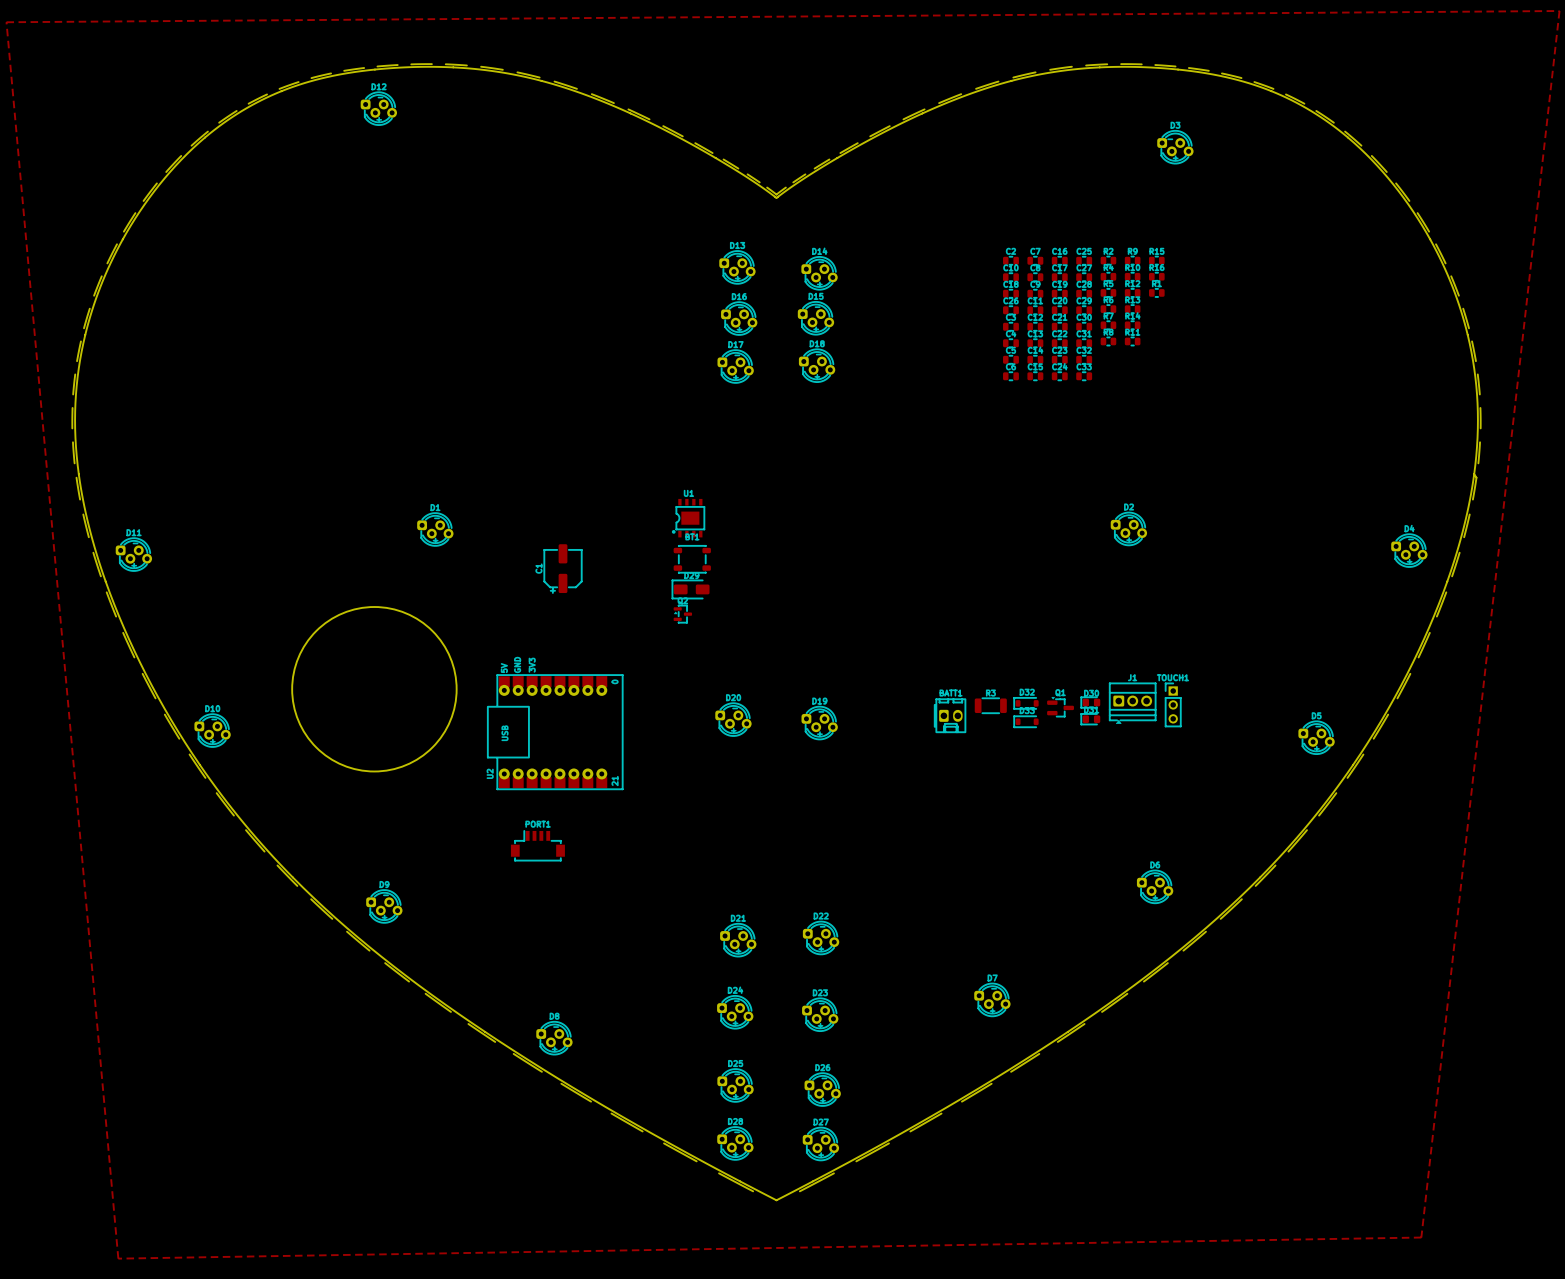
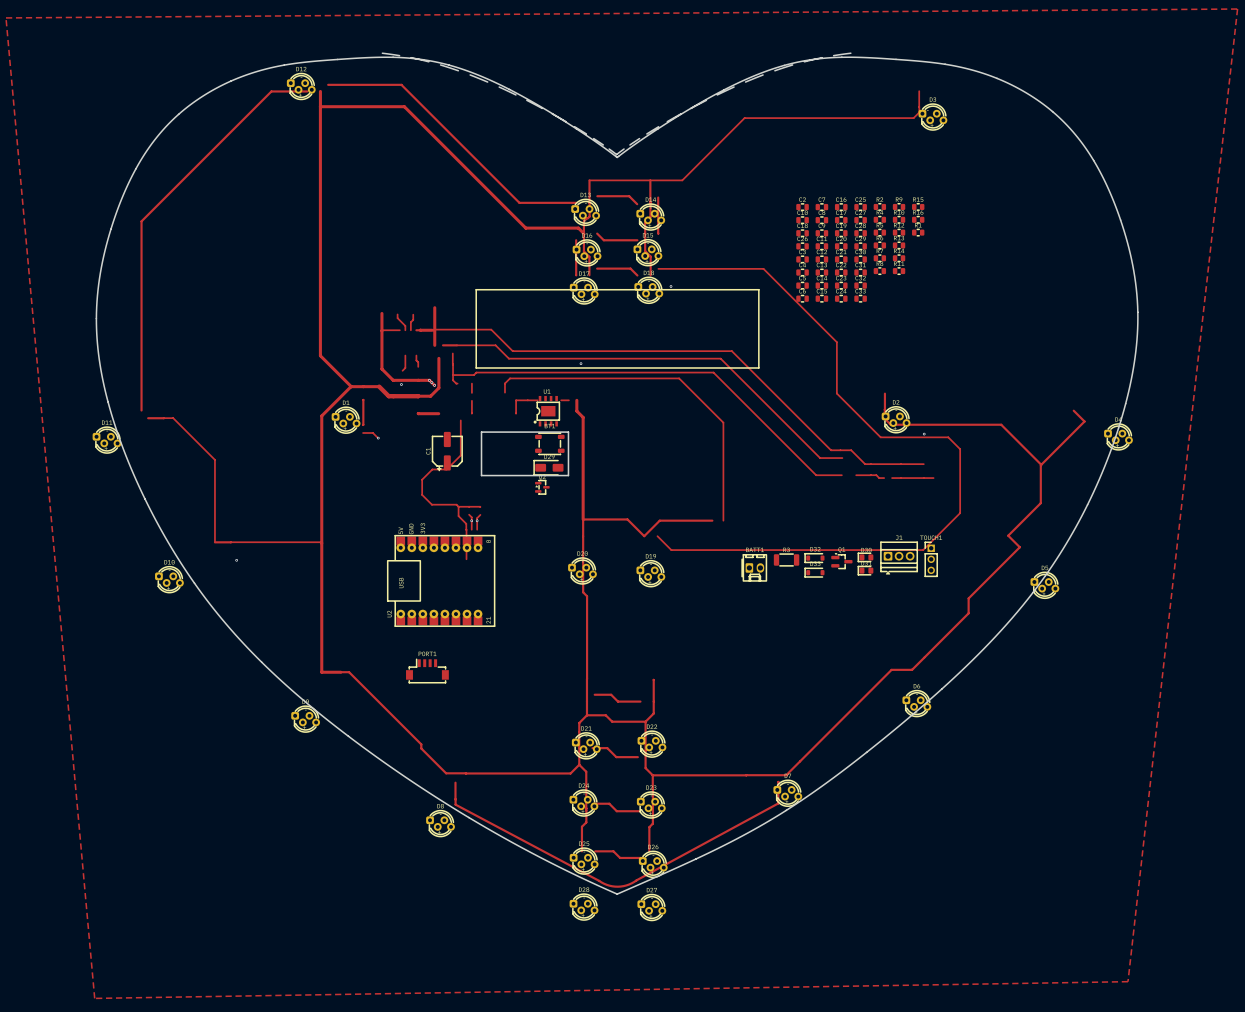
board edge: (431, 64) (411, 64) -> none
board edge: (445, 64) (466, 65) -> none
board edge: (1107, 64) (1086, 65) -> none
board edge: (1121, 64) (1141, 64) -> none
board edge: (397, 65) (377, 66) -> none
board edge: (1155, 65) (1175, 66) -> none
board edge: (364, 67) (344, 70) -> none
board edge: (1188, 67) (1208, 70) -> none
board edge: (331, 73) (311, 78) -> none
board edge: (1221, 73) (1241, 78) -> none
board edge: (298, 82) (279, 88) -> none
board edge: (1254, 82) (1273, 88) -> none
board edge: (267, 94) (248, 103) -> none
board edge: (1285, 94) (1304, 103) -> none
track: none -> (328, 84) (401, 84) (519, 202) (576, 202)
board edge: (236, 110) (219, 122) -> none
board edge: (1316, 110) (1333, 122) -> none
track: none -> (307, 91) (271, 91) (141, 221) (141, 410)
track: none -> (320, 91) (320, 106)
track: none -> (919, 91) (919, 112) (913, 118) (744, 118) (682, 180) (589, 180) (589, 216) (583, 221) (583, 251) (589, 256) (589, 275)
board edge: (207, 131) (191, 145) -> none
board edge: (1345, 131) (1361, 145) -> none
board edge: (181, 155) (166, 172) -> none
board edge: (1371, 155) (1386, 172) -> none
board edge: (156, 183) (143, 200) -> none
board edge: (1396, 183) (1409, 200) -> none
board edge: (135, 213) (123, 231) -> none
board edge: (1417, 213) (1429, 231) -> none
track: none -> (650, 180) (650, 217) (645, 222) (645, 251) (650, 256) (650, 275)
board edge: (117, 244) (107, 263) -> none
board edge: (1436, 244) (1445, 263) -> none
track: none -> (597, 196) (629, 196) (637, 204)
track: none -> (658, 197) (658, 233)
board edge: (101, 276) (94, 295) -> none
board edge: (1451, 276) (1458, 295) -> none
track: none -> (583, 233) (578, 228) (525, 228) (404, 106) (320, 106) (320, 355) (351, 386)
track: none -> (597, 233) (603, 240) (637, 240)
track: none -> (576, 240) (576, 275)
board edge: (89, 308) (84, 328) -> none
board edge: (1463, 308) (1468, 328) -> none
track: none -> (597, 268) (630, 268) (637, 275)
track: none -> (658, 268) (763, 268) (836, 342) (836, 393) (880, 437) (948, 437) (960, 449) (960, 513) (923, 550) (671, 550) (657, 536)
board edge: (80, 341) (77, 361) -> none
board edge: (1472, 341) (1475, 361) -> none
via: none -> (671, 286)
line: none -> (476, 289) (758, 289) (758, 367) (476, 367) (476, 289)
board edge: (75, 374) (73, 394) -> none
board edge: (1477, 374) (1479, 394) -> none
track: none -> (434, 307) (434, 345)
track: none -> (381, 313) (381, 369) (393, 380) (429, 380) (434, 385)
track: none -> (397, 314) (397, 318) (405, 325) (405, 330)
track: none -> (413, 314) (410, 330)
board edge: (72, 407) (72, 428) -> none
board edge: (1480, 407) (1480, 428) -> none
track: none -> (434, 329) (491, 329) (512, 351) (731, 351) (831, 450) (851, 450) (865, 464) (923, 464)
track: none -> (399, 330) (381, 330)
track: none -> (416, 330) (432, 330)
track: none -> (443, 345) (495, 345) (508, 358) (720, 358) (820, 458) (842, 458)
board edge: (72, 442) (74, 463) -> none
board edge: (1480, 442) (1478, 463) -> none
track: none -> (452, 353) (453, 380) (457, 383)
track: none -> (405, 355) (405, 368) (402, 370)
track: none -> (416, 355) (418, 366)
track: none -> (438, 358) (438, 387) (430, 396) (388, 396) (379, 386) (351, 386) (321, 415) (321, 672) (340, 672)
via: none -> (581, 363)
track: none -> (453, 375) (473, 375) (476, 372) (713, 372) (816, 475) (841, 475)
board edge: (1474, 474) (1464, 526) (1449, 574) (1429, 627) (1401, 685) (1374, 731) (1342, 780) (1309, 823) (1266, 870) (1228, 908) (1182, 947) (1134, 985) (1067, 1031) (931, 1115) (776, 1200) (604, 1106) (528, 1060) (458, 1013) (394, 966) (346, 927) (303, 887) (261, 843) (215, 787) (178, 731) (145, 673) (118, 615) (98, 560) (84, 506) (76, 455) (75, 402) (81, 351) (96, 298) (116, 251) (144, 204) (181, 159) (218, 126) (261, 100) (304, 83) (356, 71) (418, 66) (480, 69) (535, 79) (592, 97) (653, 124) (725, 163) (776, 197) (819, 168) (877, 135) (927, 111) (977, 91) (1017, 79) (1061, 70) (1104, 67) (1149, 67) (1190, 70) (1225, 77) (1254, 85) (1286, 97) (1315, 113) (1343, 133) (1371, 159) (1393, 184) (1417, 218) (1436, 251) (1452, 286) (1464, 322) (1472, 360) (1477, 394) (1477, 437) (1474, 474) -> (393, 57) (304, 62) (250, 73) (223, 84) (199, 98) (178, 114) (157, 136) (140, 161) (123, 194) (110, 229) (101, 267) (97, 301) (96, 333) (100, 364) (108, 401) (133, 474) (171, 547) (213, 609) (266, 667) (336, 727) (428, 792) (521, 847) (617, 894) (736, 838) (780, 813) (821, 786) (880, 741) (941, 689) (989, 642) (1028, 598) (1059, 554) (1084, 510) (1107, 460) (1124, 409) (1134, 362) (1137, 323) (1135, 282) (1127, 242) (1116, 208) (1103, 178) (1087, 150) (1070, 128) (1049, 109) (1022, 90) (997, 78) (967, 68) (926, 61) (858, 57) (820, 58) (787, 64) (750, 77) (710, 96) (661, 126) (617, 157) (552, 113) (490, 80) (442, 63) (393, 57)
board edge: (1474, 474) (1476, 477) (1472, 499) -> none
board edge: (76, 477) (80, 499) -> none
via: none -> (429, 380)
via: none -> (431, 382)
track: none -> (471, 383) (471, 392)
via: none -> (401, 384)
via: none -> (434, 385)
track: none -> (504, 392) (504, 383) (510, 378) (679, 378) (723, 422) (723, 520)
track: none -> (884, 393) (884, 418) (890, 424) (1001, 424) (1041, 464)
track: none -> (363, 400) (363, 425)
track: none -> (537, 400) (516, 400) (516, 413)
track: none -> (561, 400) (568, 400)
track: none -> (576, 400) (576, 411) (583, 417) (583, 519)
track: none -> (471, 400) (471, 413)
board edge: (83, 514) (88, 537) -> none
board edge: (1469, 514) (1464, 537) -> none
track: none -> (1073, 410) (1084, 421) (1040, 465) (1040, 503) (1008, 535) (1019, 547) (968, 598) (968, 613) (912, 669) (891, 669) (786, 775) (652, 775)
track: none -> (418, 413) (438, 413)
track: none -> (148, 418) (173, 418) (214, 459) (214, 542) (321, 543)
track: none -> (460, 420) (460, 455) (446, 469) (432, 469) (422, 479) (422, 494) (431, 504) (456, 504) (458, 506)
board edge: none -> (481, 432) (568, 432) (568, 475) (481, 475) (481, 432)
track: none -> (363, 433) (372, 433) (378, 438)
via: none -> (924, 434)
board edge: (93, 552) (100, 576) -> none
via: none -> (378, 438)
board edge: (1459, 552) (1452, 576) -> none
board edge: (106, 592) (116, 616) -> none
board edge: (1446, 592) (1436, 616) -> none
track: none -> (856, 475) (870, 475)
track: none -> (870, 475) (884, 478)
track: none -> (892, 478) (933, 478)
round board edge: [292, 606, 457, 772] -> none
board edge: (123, 632) (134, 657) -> none
board edge: (1429, 632) (1418, 657) -> none
track: none -> (458, 506) (480, 506)
track: none -> (458, 506) (458, 516) (466, 523) (466, 559)
track: none -> (469, 514) (471, 517) (471, 529)
track: none -> (480, 514) (477, 518) (477, 529)
track: none -> (583, 519) (583, 592) (587, 596) (586, 715)
track: none -> (583, 519) (627, 519) (644, 536) (659, 520) (712, 520)
via: none -> (471, 520)
via: none -> (477, 520)
board edge: (142, 673) (155, 698) -> none
board edge: (1410, 673) (1397, 698) -> none
via: none -> (236, 560)
board edge: (164, 714) (179, 738) -> none
board edge: (1388, 714) (1373, 738) -> none
board edge: (189, 754) (205, 777) -> none
board edge: (1363, 754) (1347, 777) -> none
board edge: (216, 793) (233, 815) -> none
board edge: (1336, 793) (1319, 815) -> none
board edge: (246, 830) (264, 851) -> none
board edge: (1307, 830) (1288, 851) -> none
track: none -> (340, 672) (349, 672) (421, 744) (421, 748) (446, 773) (570, 773) (579, 764)
track: none -> (653, 679) (653, 713) (645, 721)
board edge: (277, 865) (297, 885) -> none
board edge: (1275, 865) (1255, 885) -> none
track: none -> (594, 694) (611, 694) (617, 701) (640, 701)
board edge: (311, 899) (332, 918) -> none
board edge: (1241, 899) (1220, 918) -> none
track: none -> (586, 715) (605, 715) (612, 721) (645, 721)
track: none -> (586, 715) (579, 723) (579, 764)
track: none -> (645, 721) (645, 768) (652, 775)
board edge: (347, 931) (369, 950) -> none
board edge: (1205, 931) (1183, 950) -> none
track: none -> (592, 748) (607, 748) (616, 757) (637, 757)
board edge: (385, 963) (409, 981) -> none
board edge: (1167, 963) (1143, 981) -> none
track: none -> (579, 764) (586, 771) (586, 822) (581, 826) (581, 851)
track: none -> (652, 775) (652, 823) (649, 827) (649, 851)
track: none -> (778, 781) (778, 803) (631, 883) (617, 886) (604, 883) (455, 804) (455, 782)
board edge: (425, 993) (450, 1011) -> none
board edge: (1127, 993) (1102, 1011) -> none
track: none -> (594, 803) (609, 803) (616, 811) (639, 811)
board edge: (468, 1023) (495, 1041) -> none
board edge: (1084, 1023) (1057, 1041) -> none
board edge: (513, 1053) (541, 1071) -> none
board edge: (1039, 1053) (1011, 1071) -> none
track: none -> (595, 851) (613, 851) (620, 857) (641, 857)
board edge: (561, 1083) (591, 1101) -> none
board edge: (991, 1083) (961, 1101) -> none
board edge: (611, 1113) (642, 1131) -> none
board edge: (941, 1113) (910, 1131) -> none
board edge: (664, 1143) (696, 1161) -> none
board edge: (888, 1143) (856, 1161) -> none
board edge: (719, 1173) (753, 1191) -> none
board edge: (833, 1173) (799, 1191) -> none

